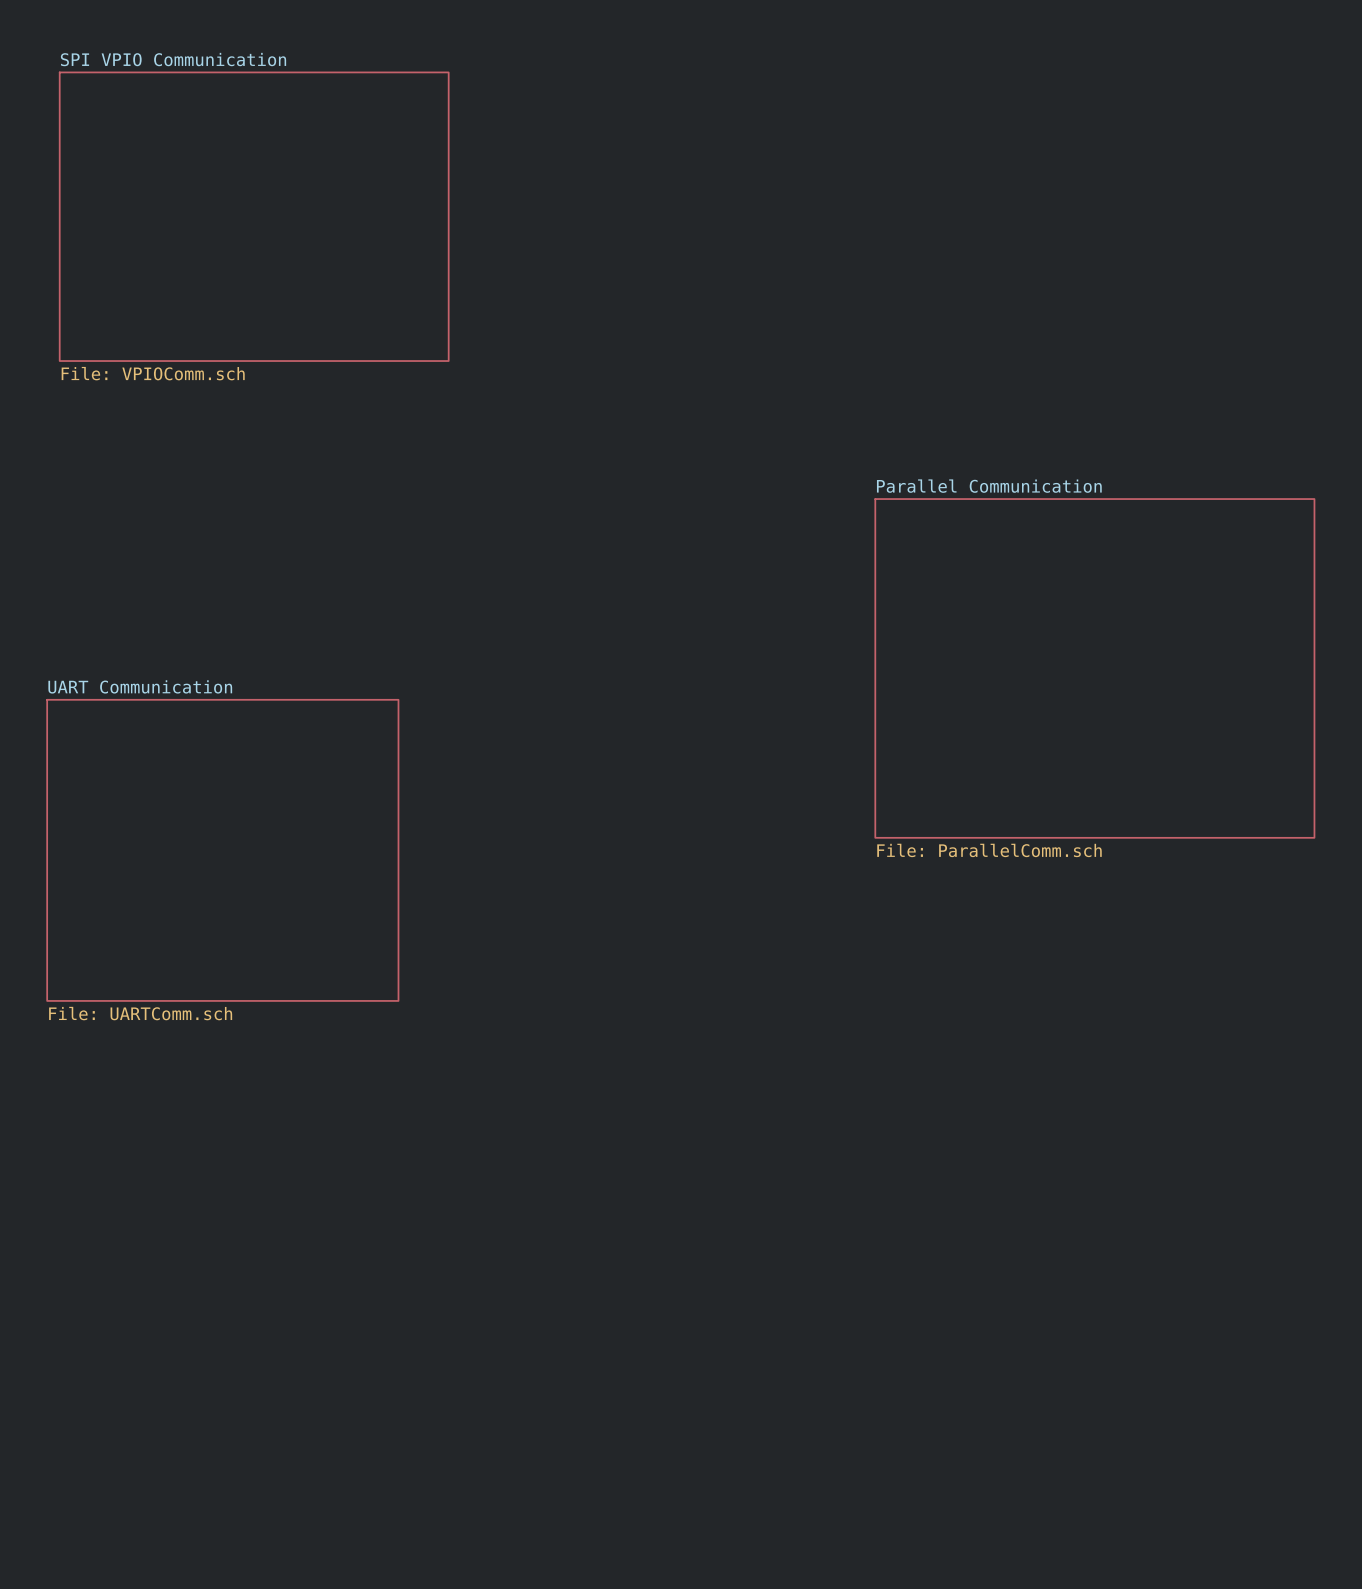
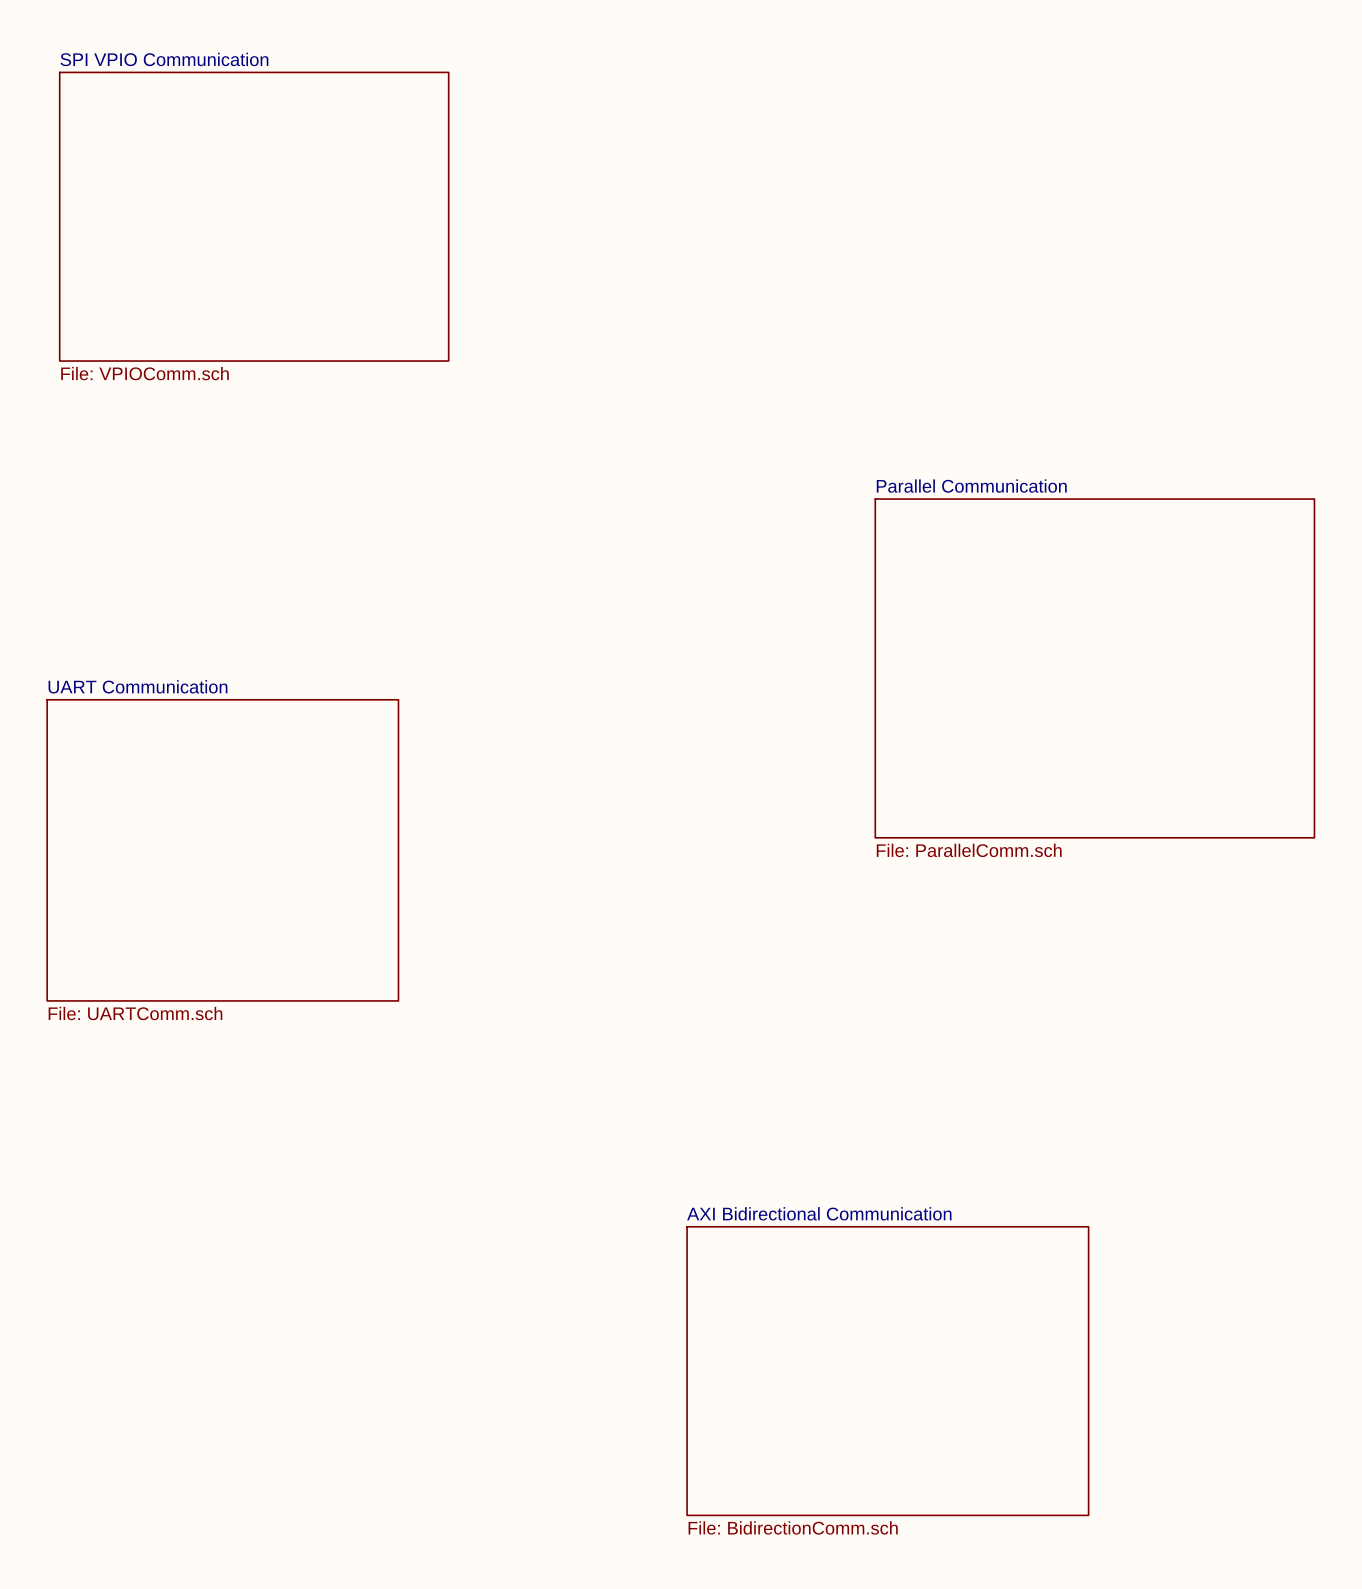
sheet AXI Bidirectional Communication: none -> File: BidirectionComm.sch (887, 1371)

